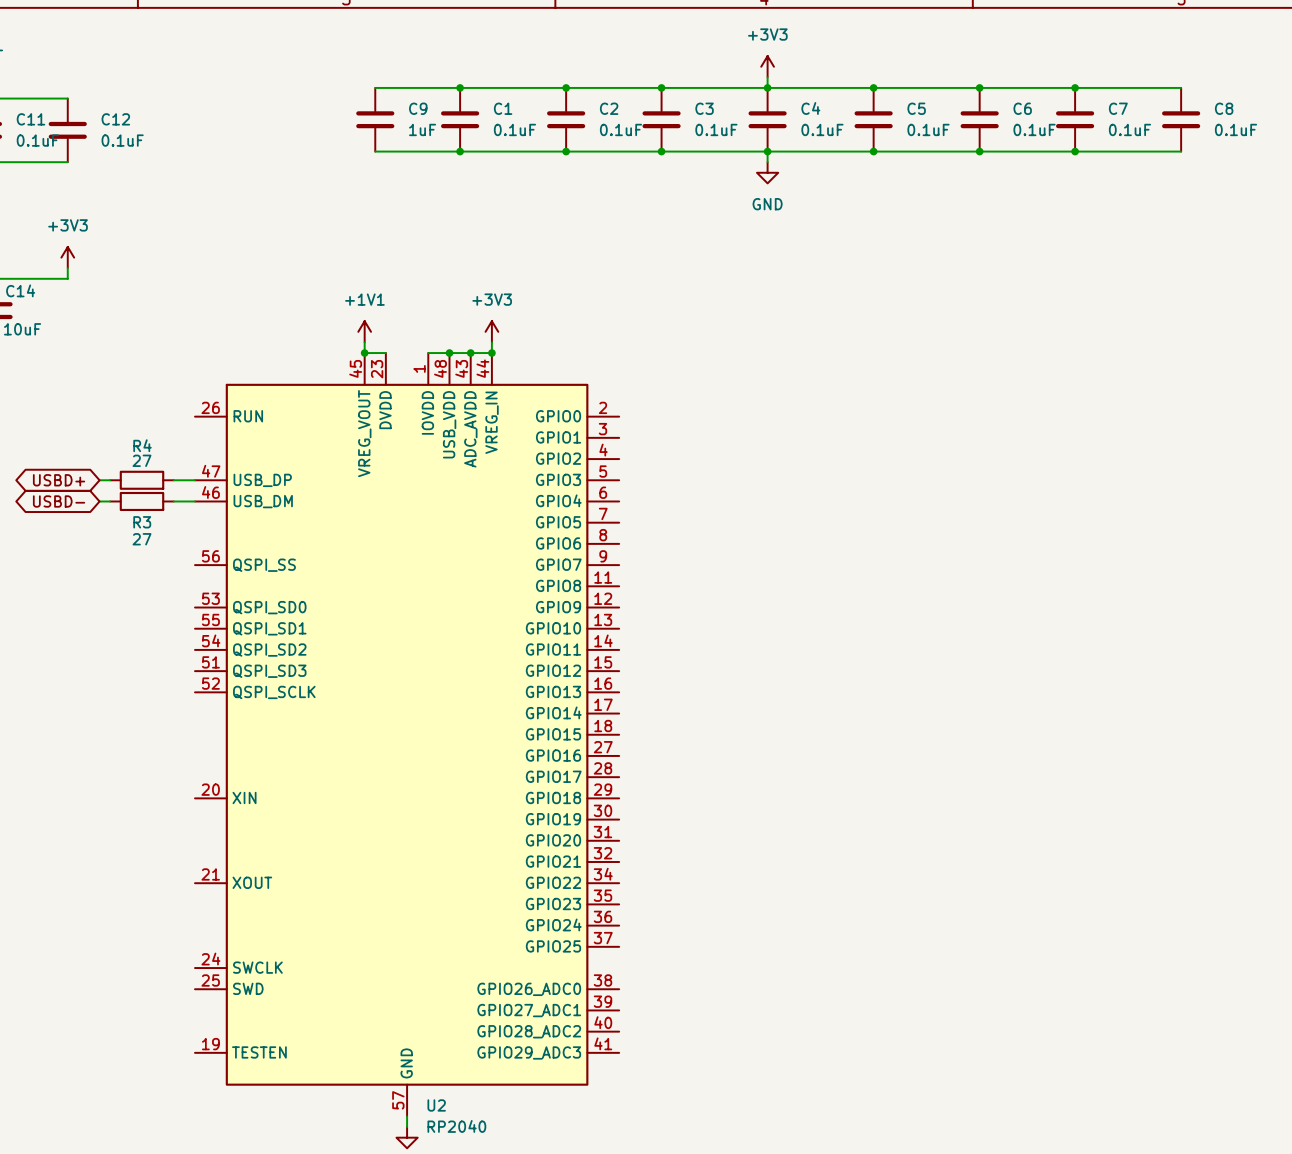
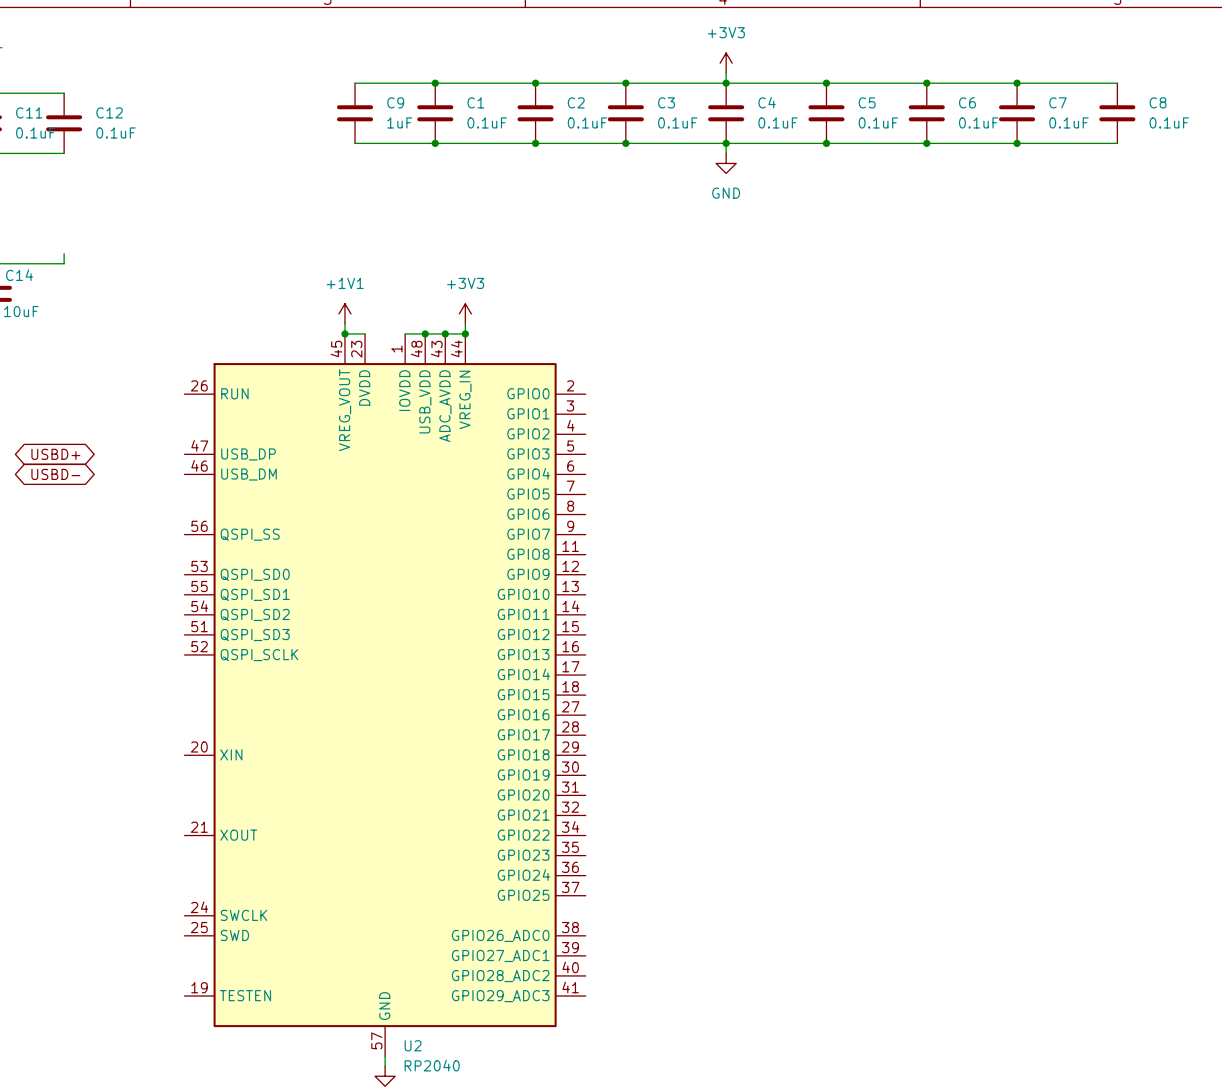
power symbol: +3V3 (67, 257) -> none
wire: (99, 480) (110, 480) -> none
R4: 27 (141, 480) -> none
wire: (173, 480) (195, 480) -> none
wire: (99, 501) (110, 501) -> none
R3: 27 (141, 501) -> none
wire: (173, 501) (195, 501) -> none

